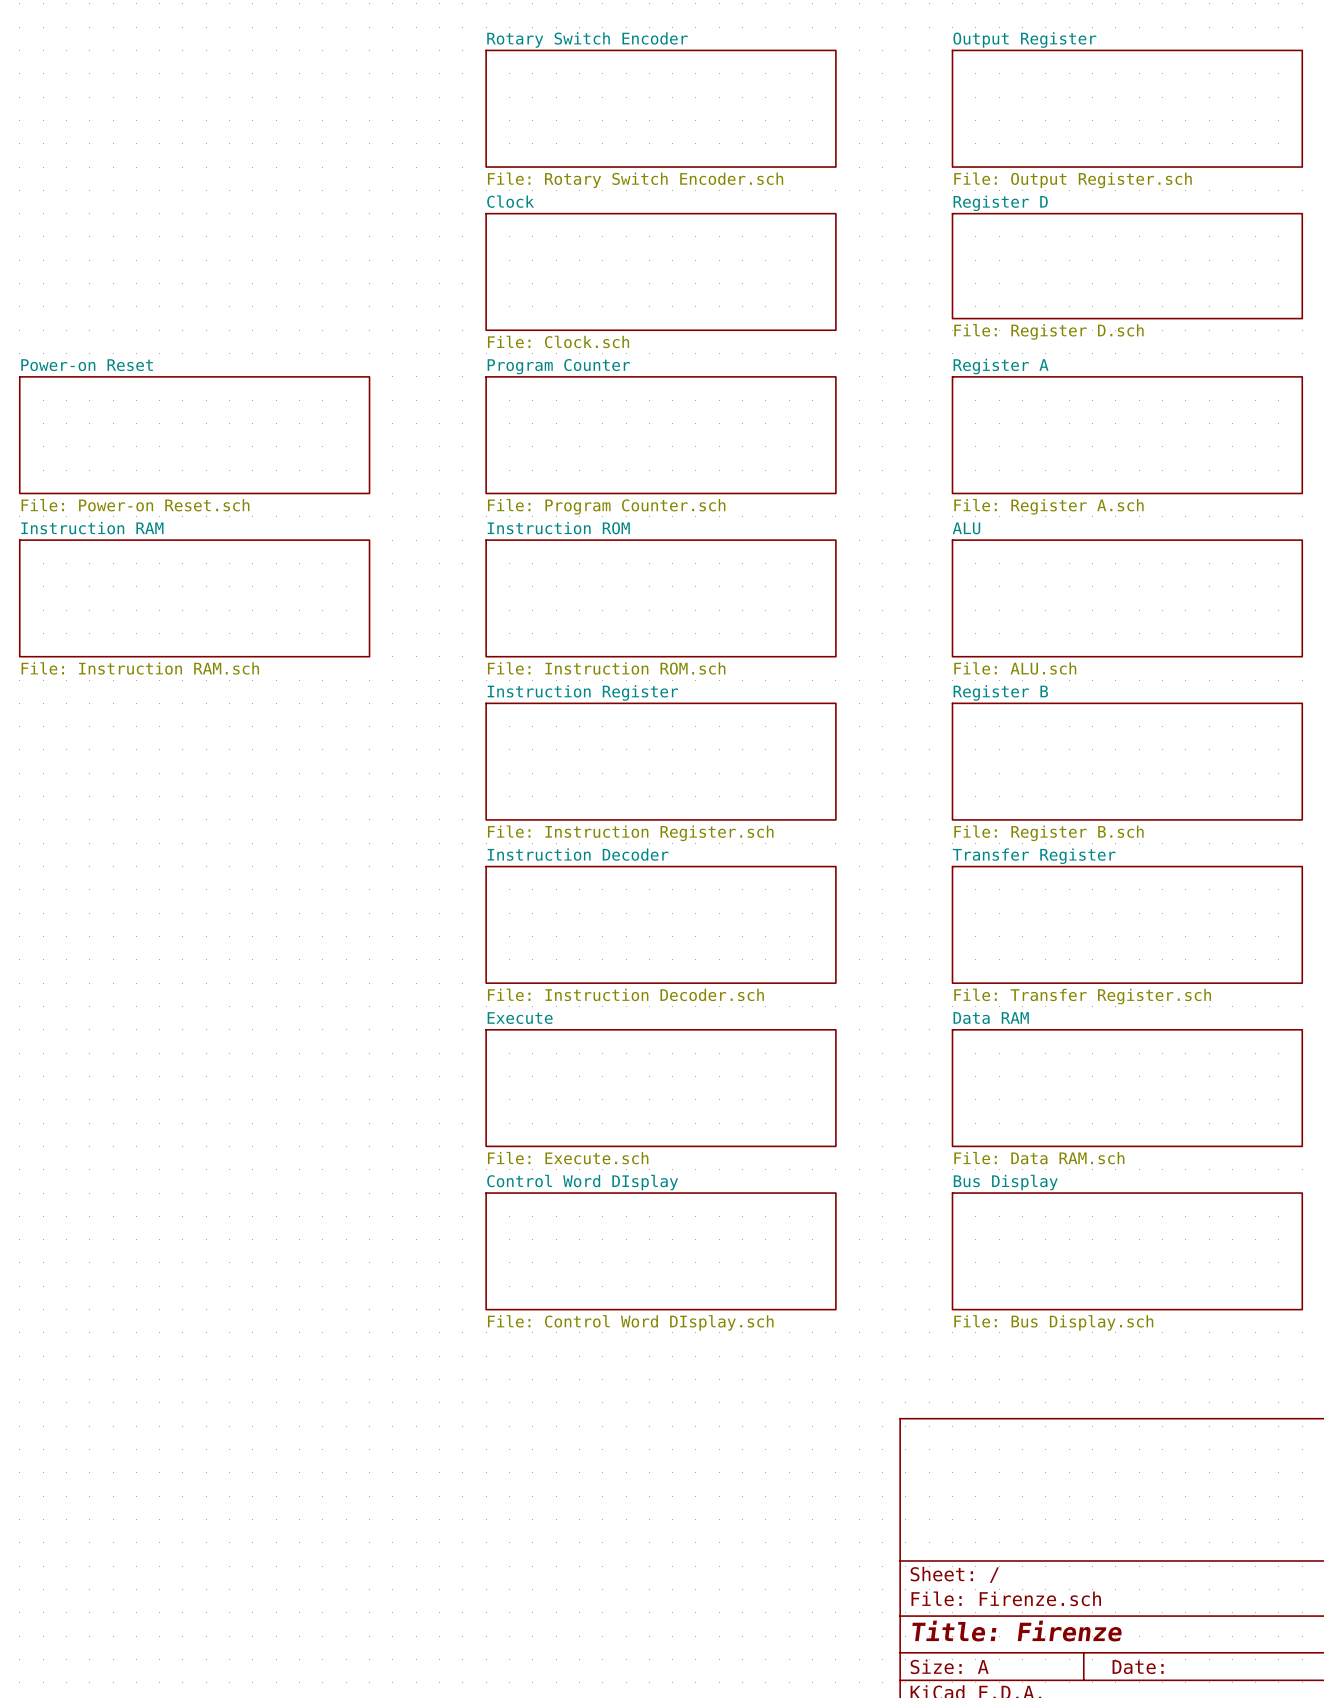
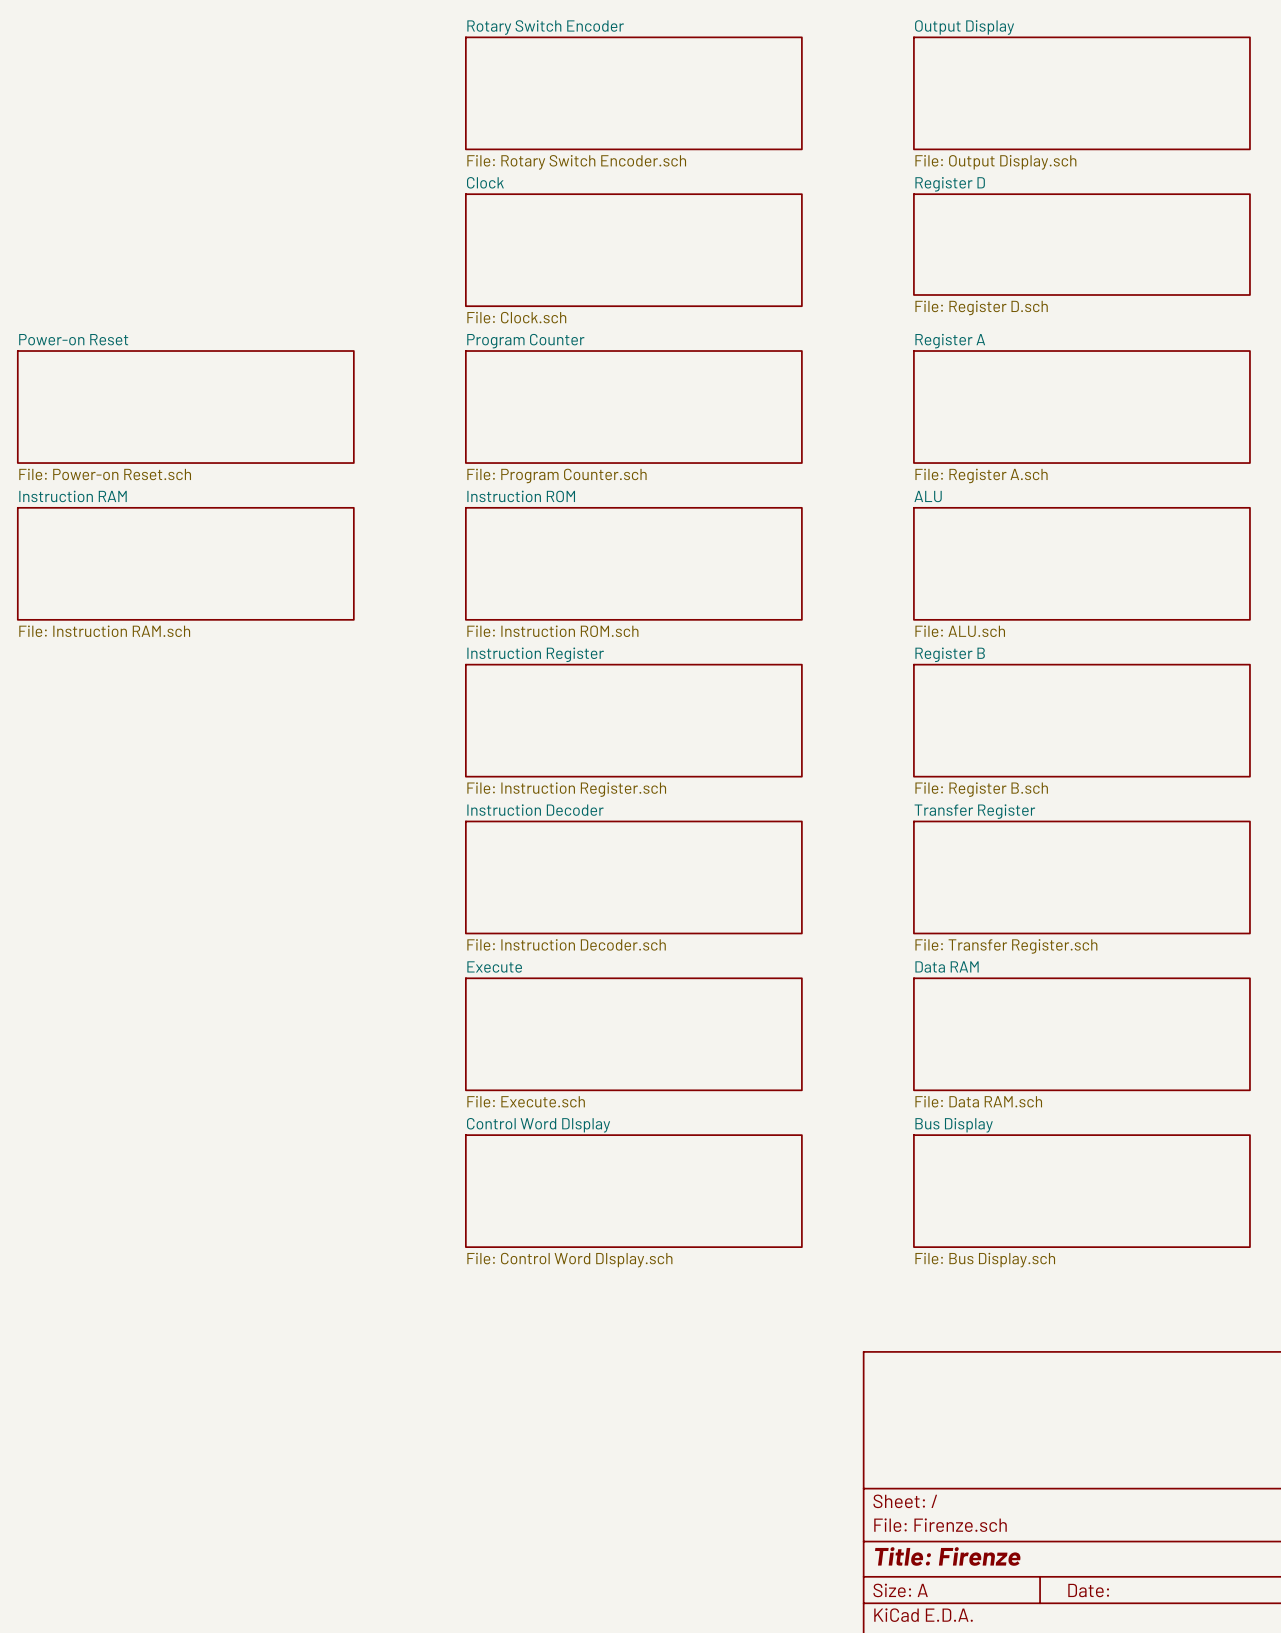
sheet Output Register name: Output Register (1024, 40) -> Output Display (964, 27)
sheet Output Register value: File: Output Register.sch (1073, 180) -> File: Output Display.sch (995, 162)

